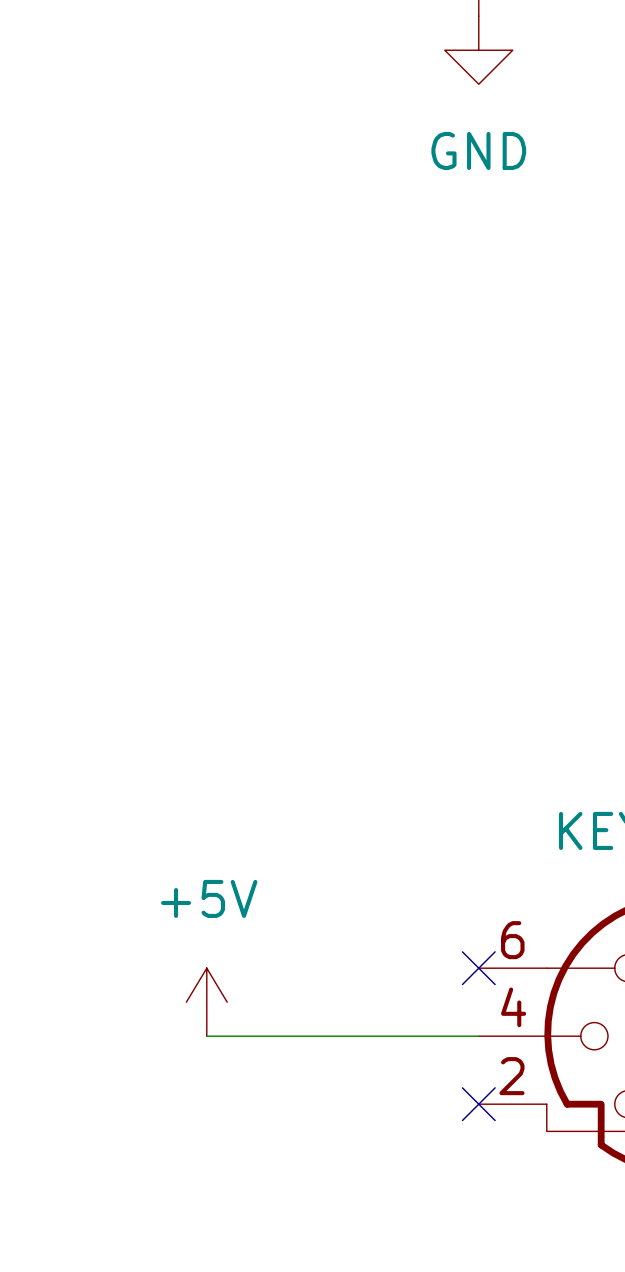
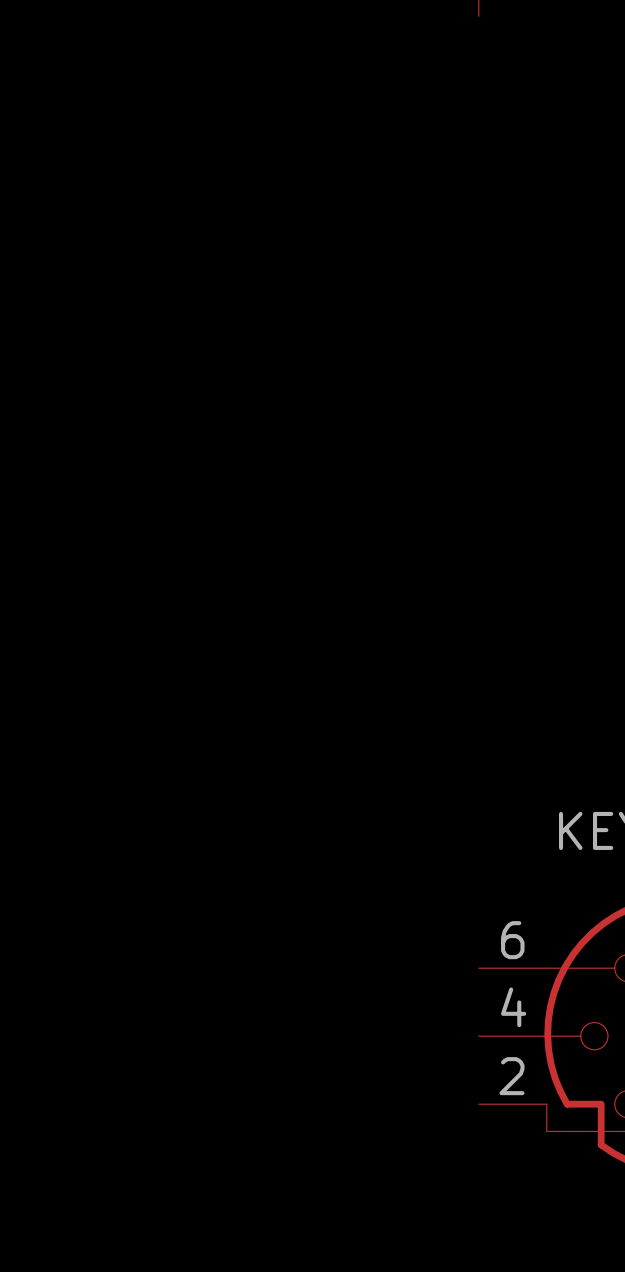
power symbol: GND (478, 50) -> none
no-connect mark: (478, 968) -> none
power symbol: +5V (206, 1002) -> none
wire: (206, 1036) (478, 1036) -> none
no-connect mark: (478, 1104) -> none

